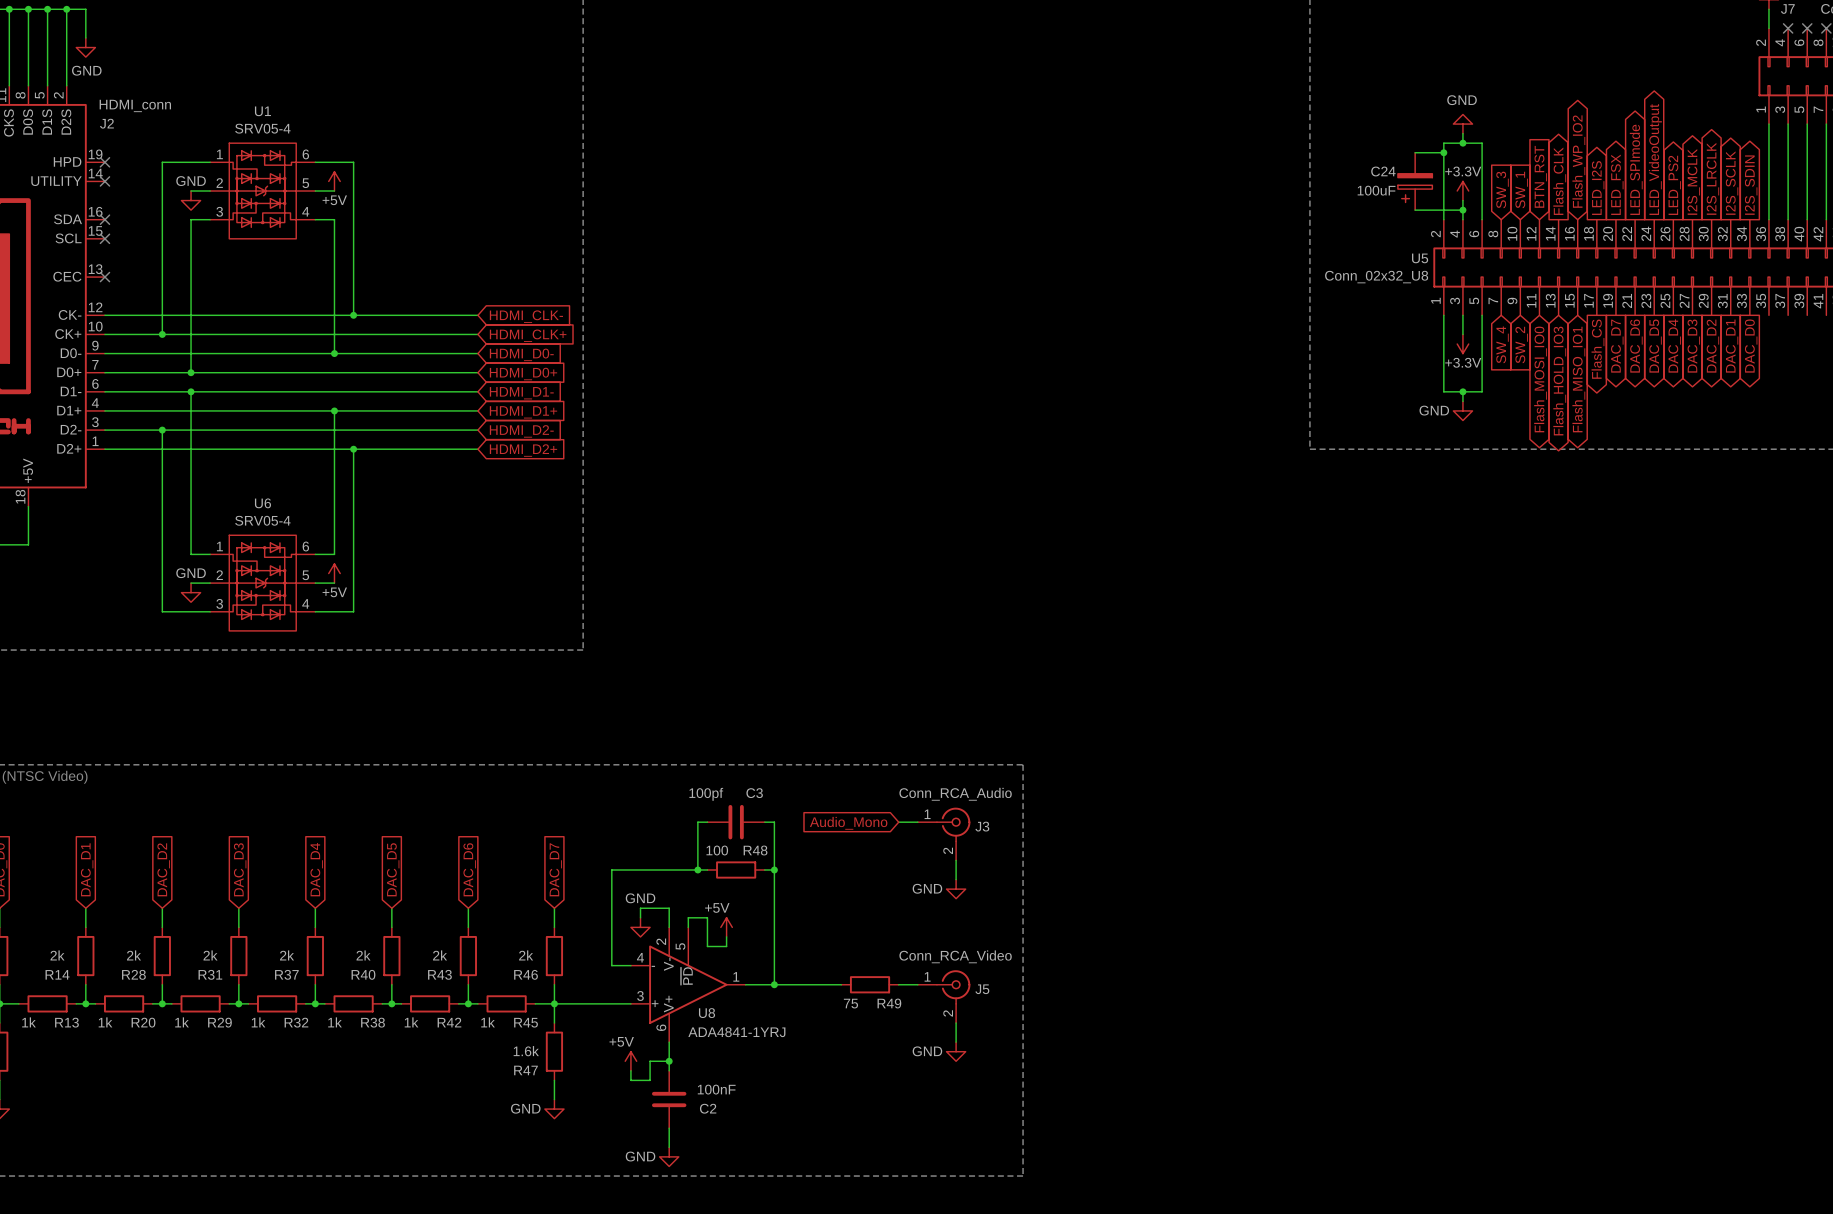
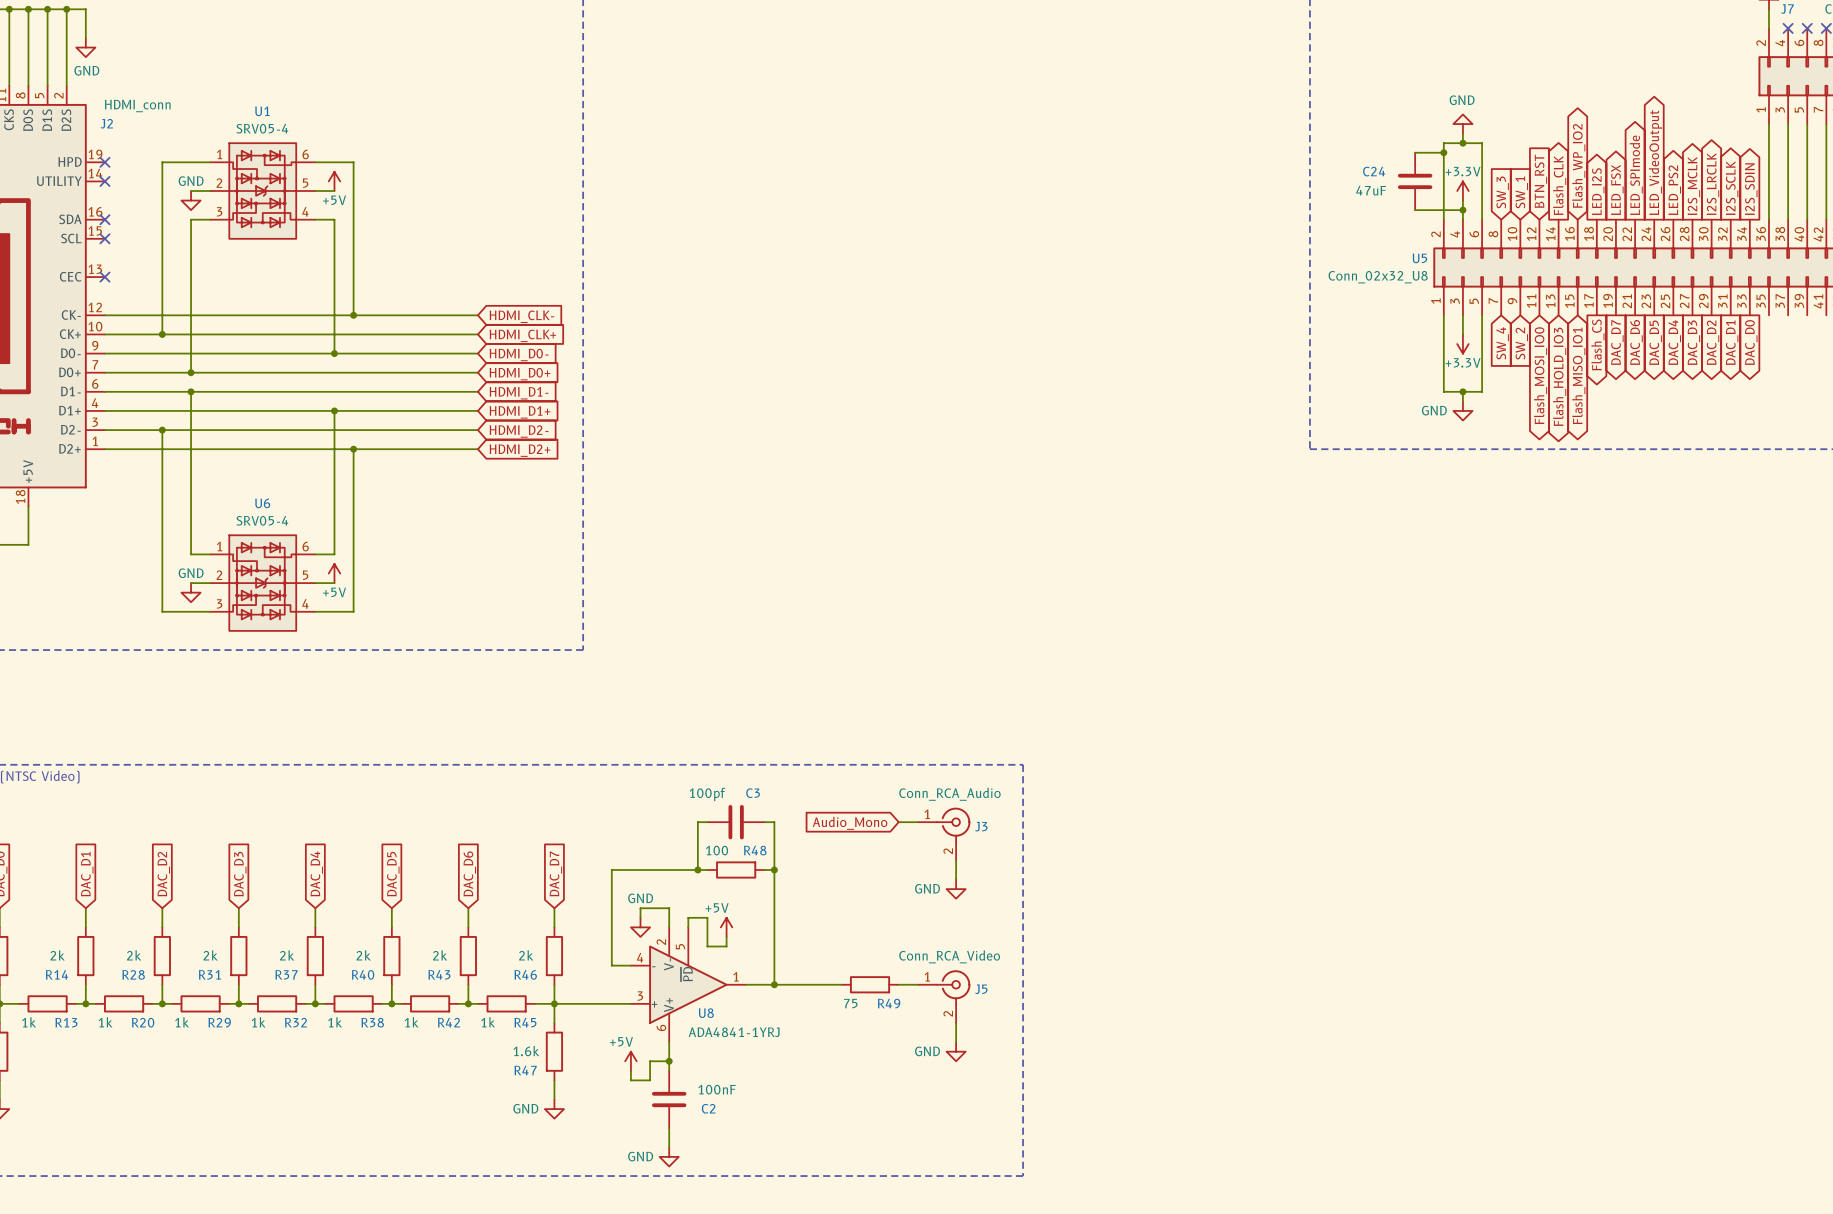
C24 symbol: [1397, 152, 1433, 211] -> [1397, 152, 1433, 211]
C24 value: 100uF (1376, 190) -> 47uF (1371, 190)

